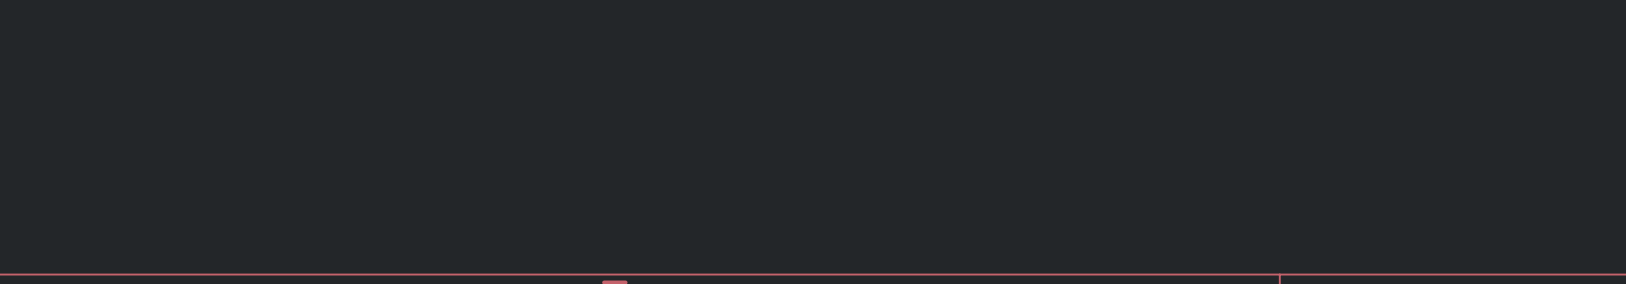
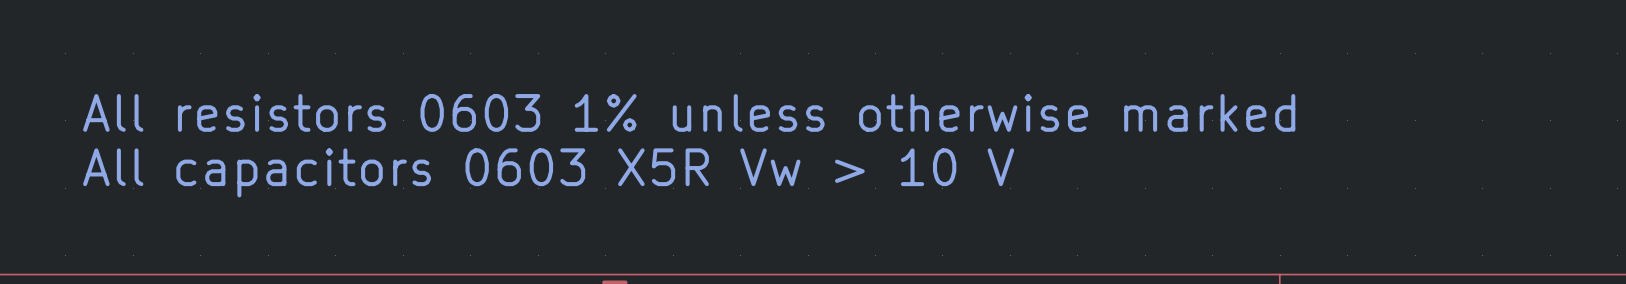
text: none -> All resistors 0603 1% unless otherwise marked (689, 112)
text: none -> All capacitors 0603 X5R Vw > 10 V (548, 172)

